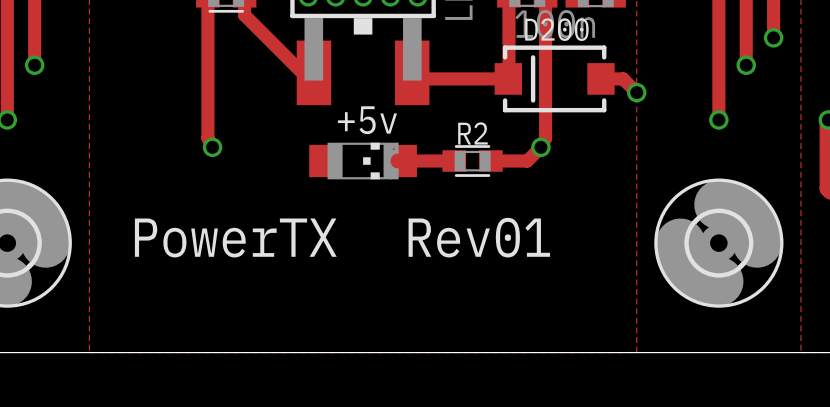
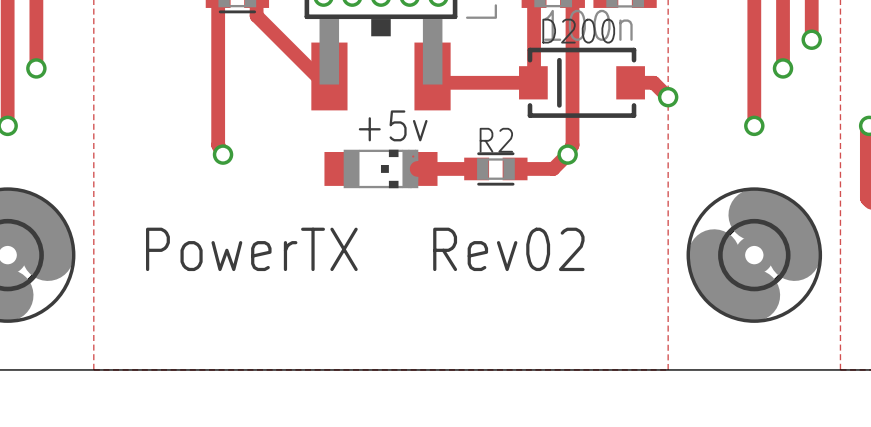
text: Rev01 (479, 237) -> Rev02 (508, 249)

